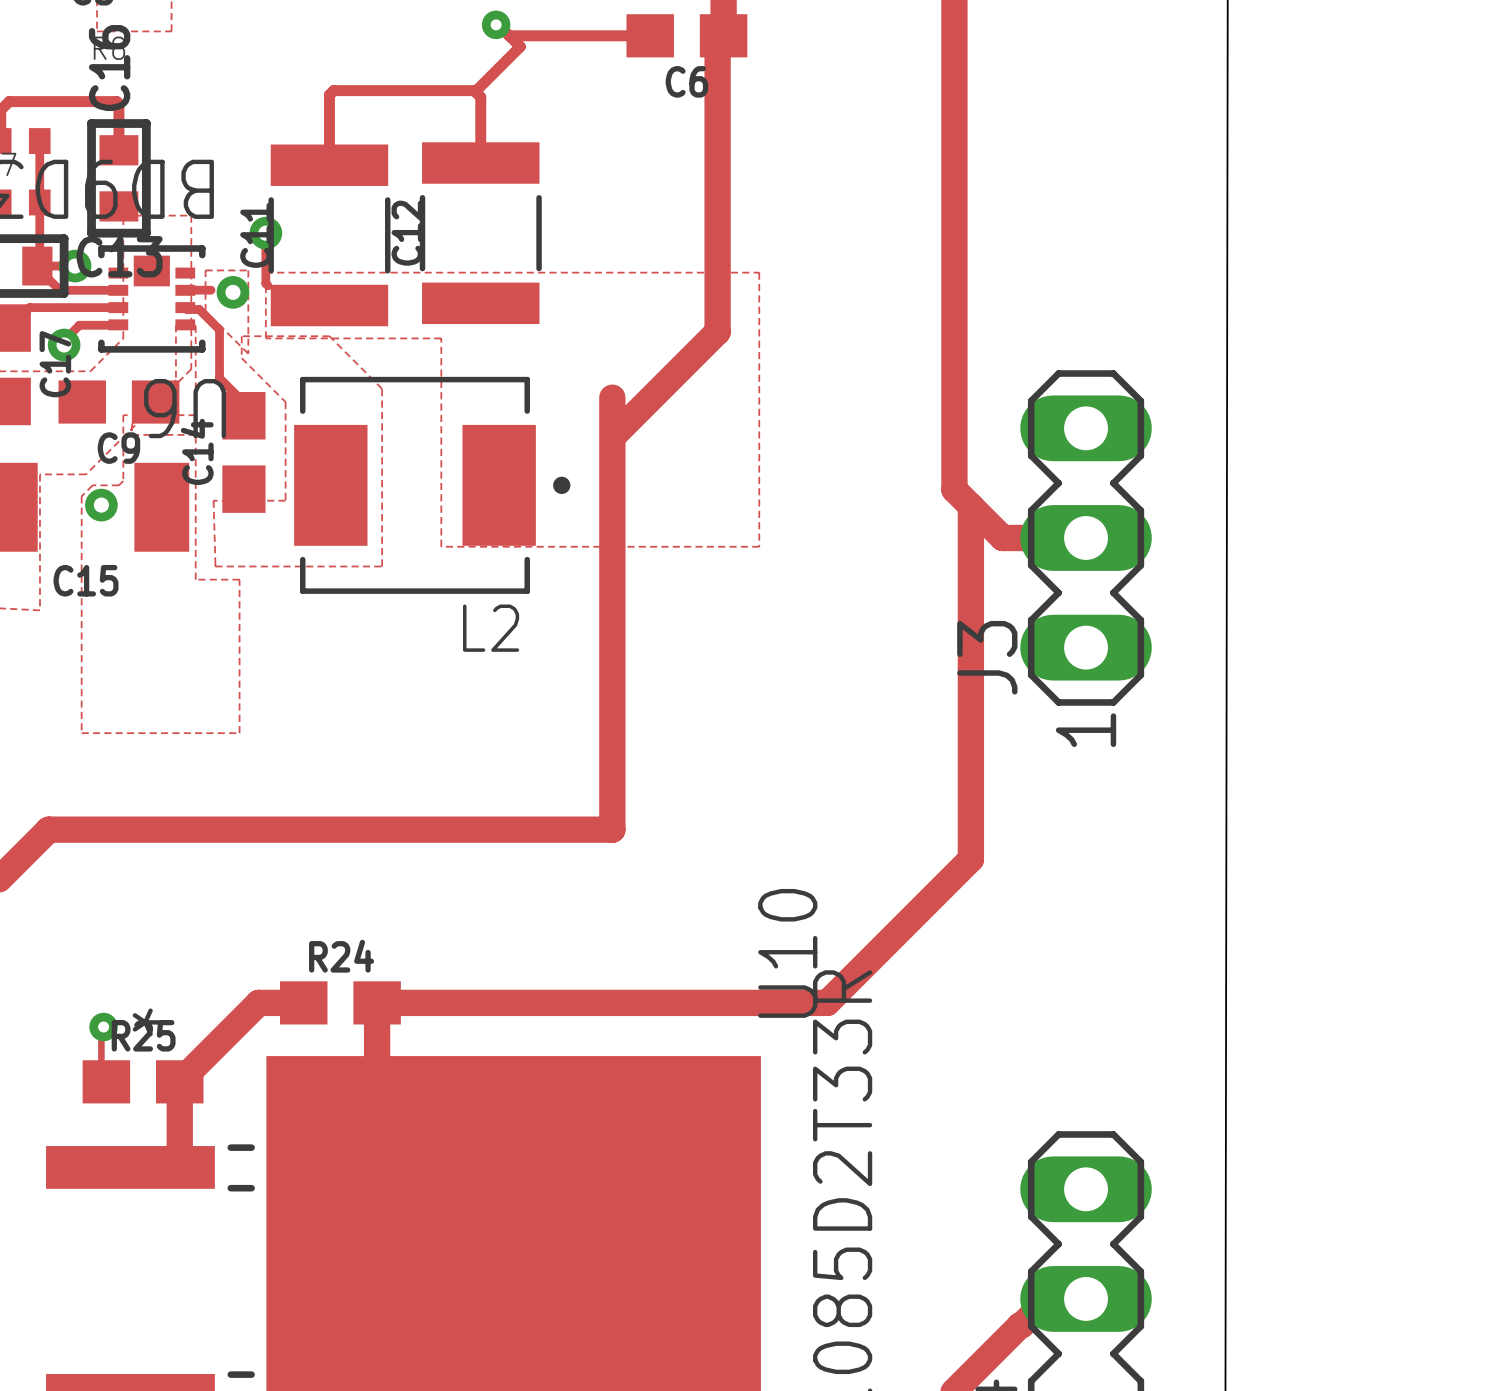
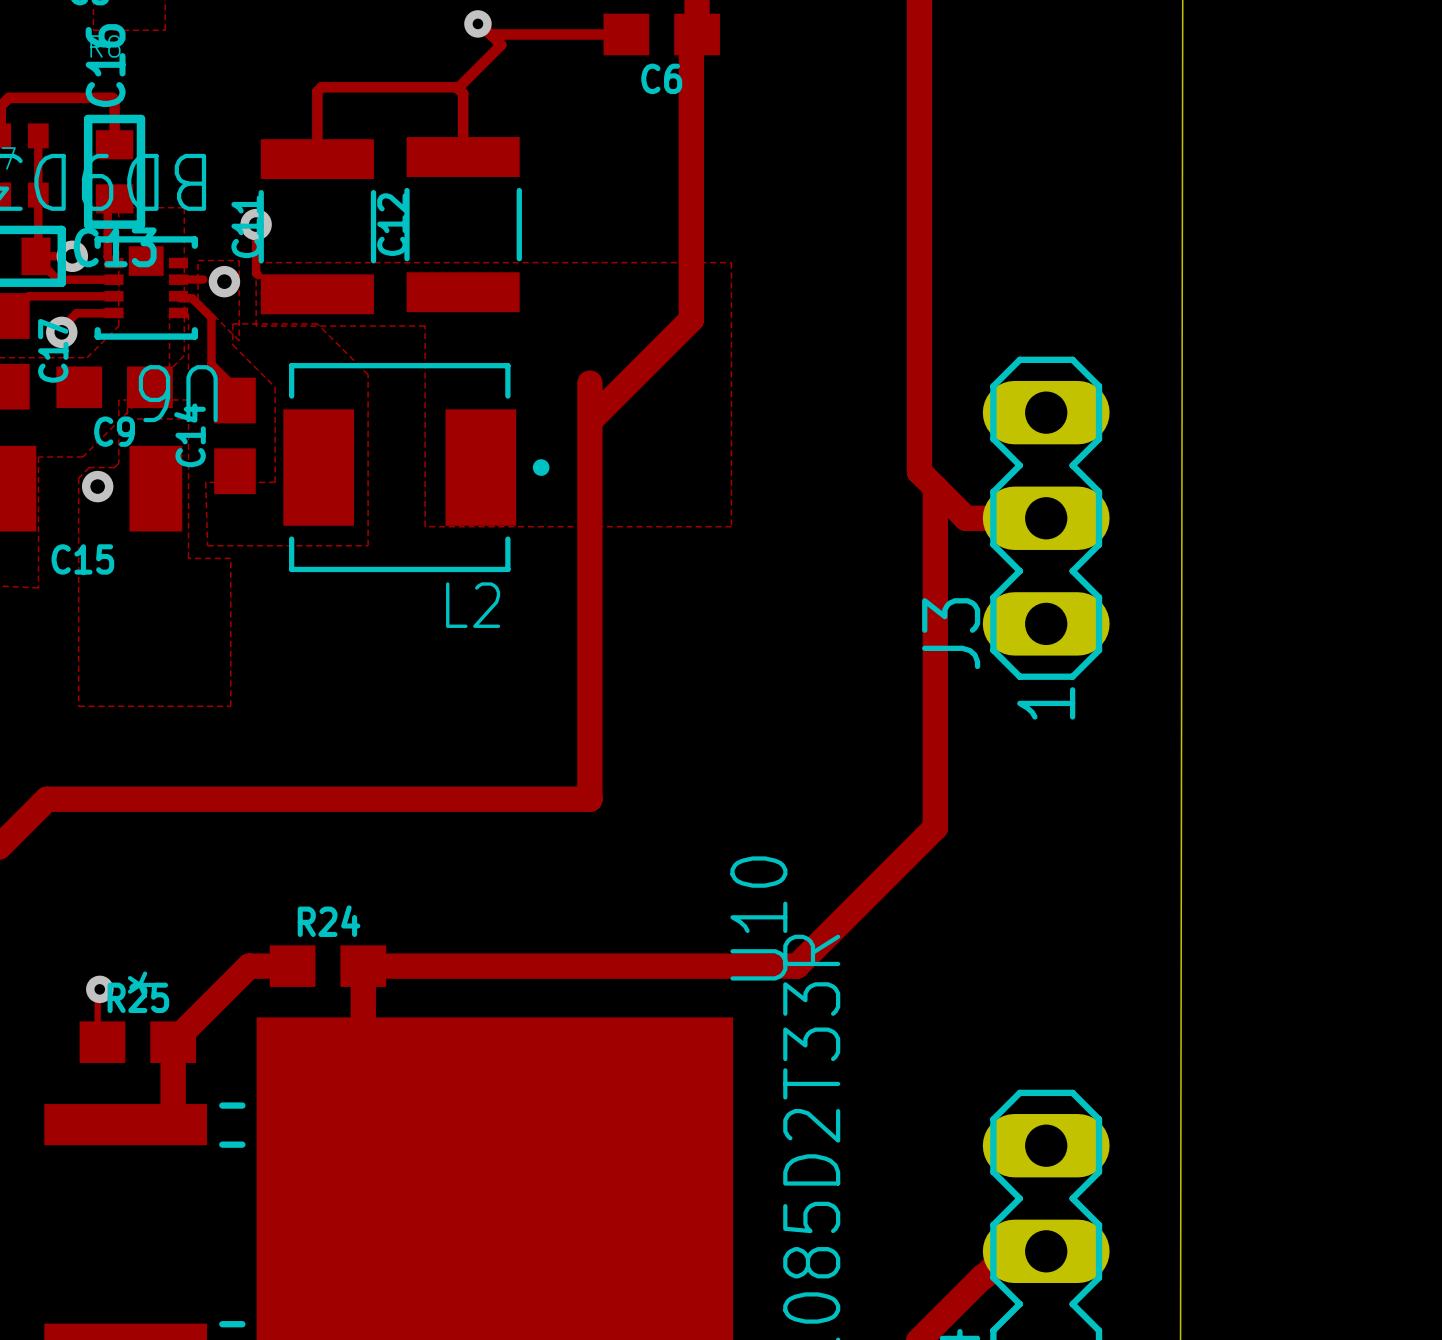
track: none -> (114, 198) (107, 205) (107, 256) (114, 263)

